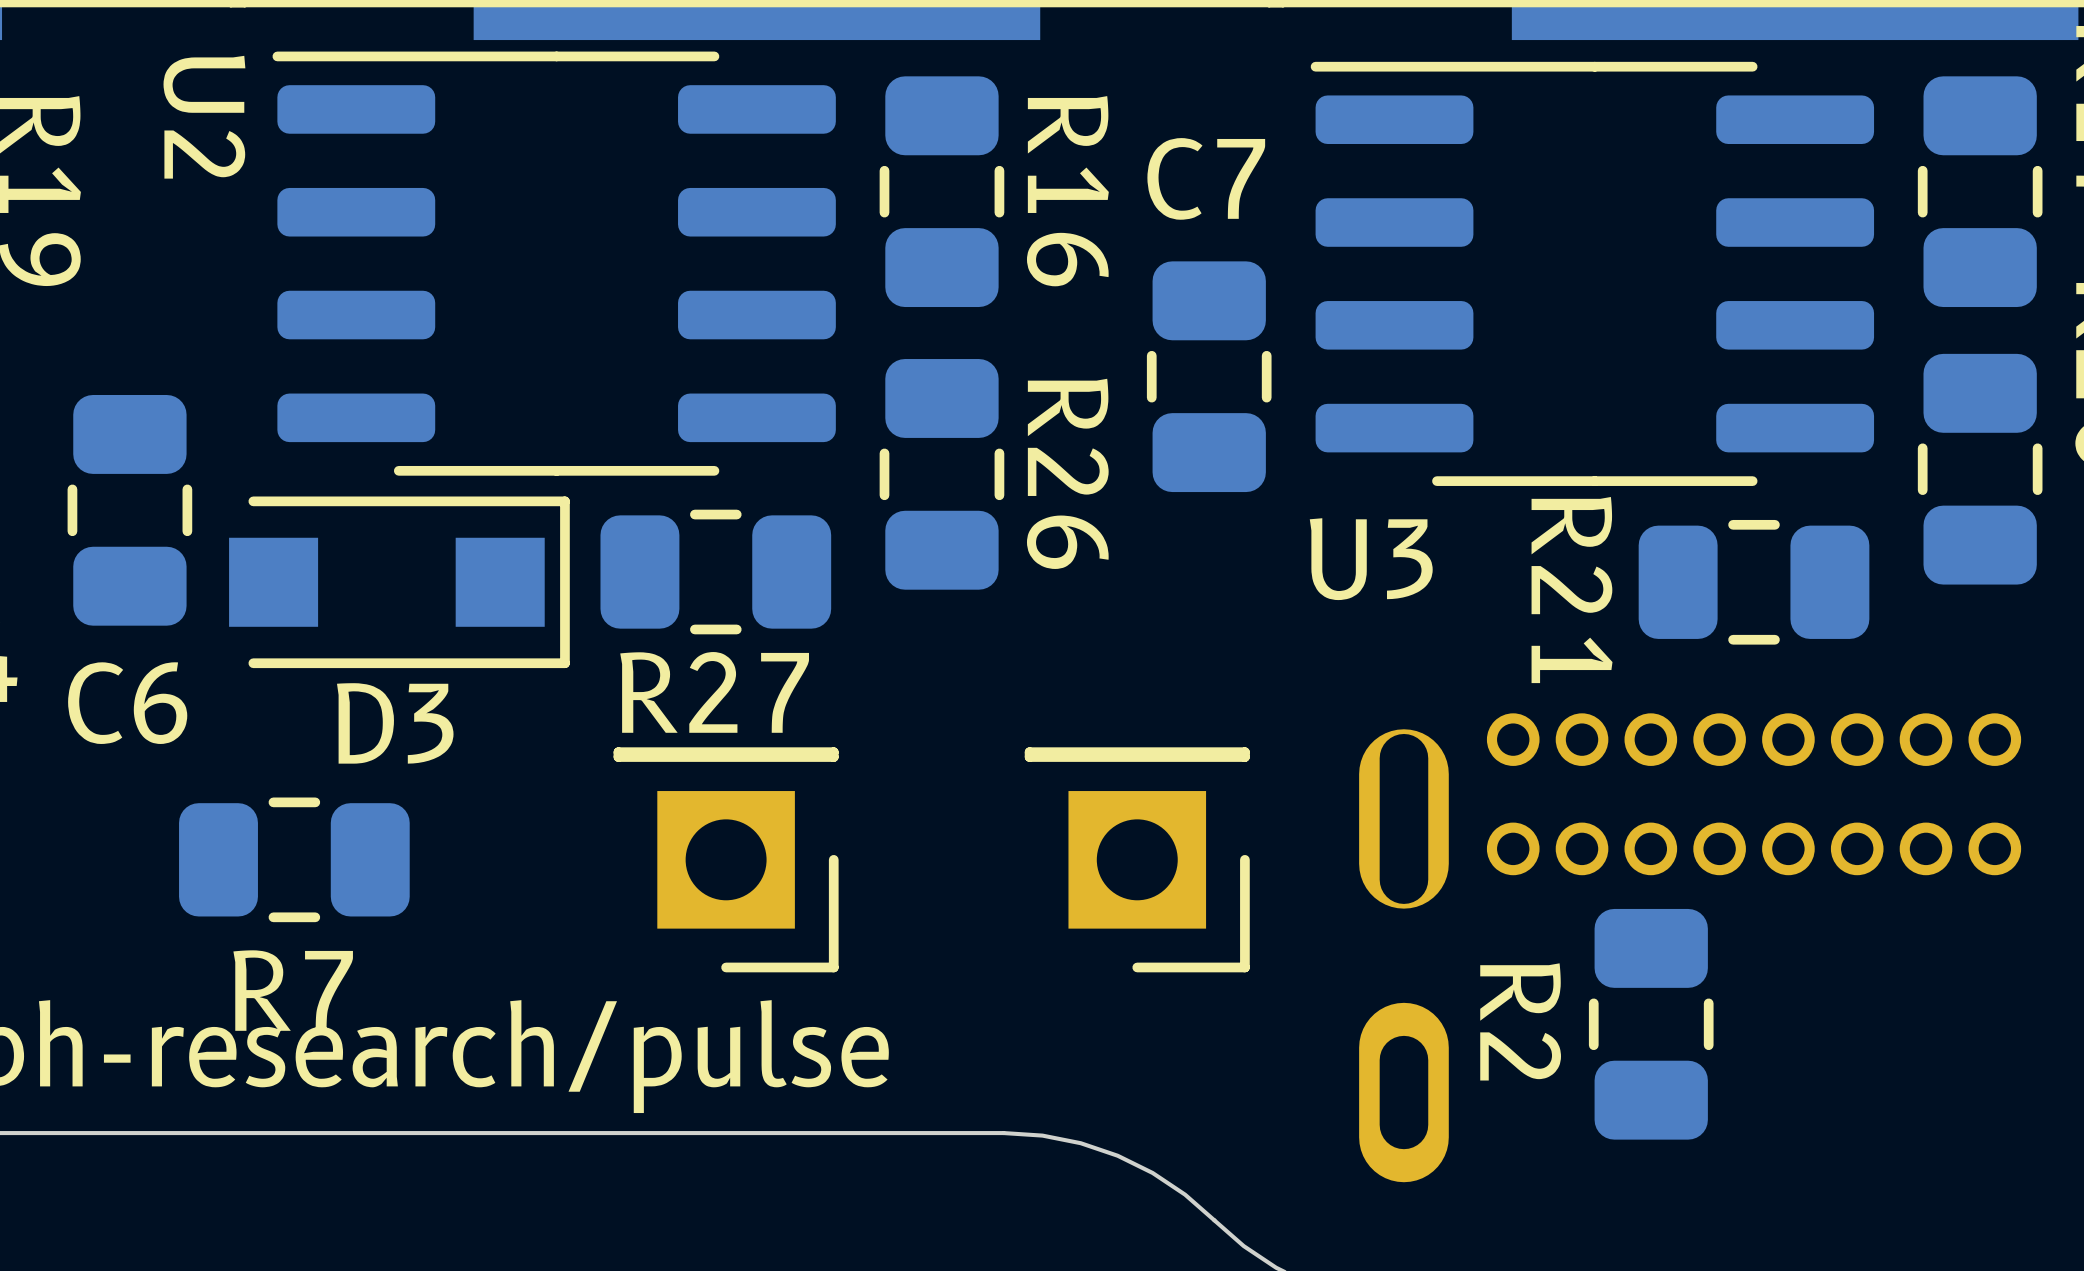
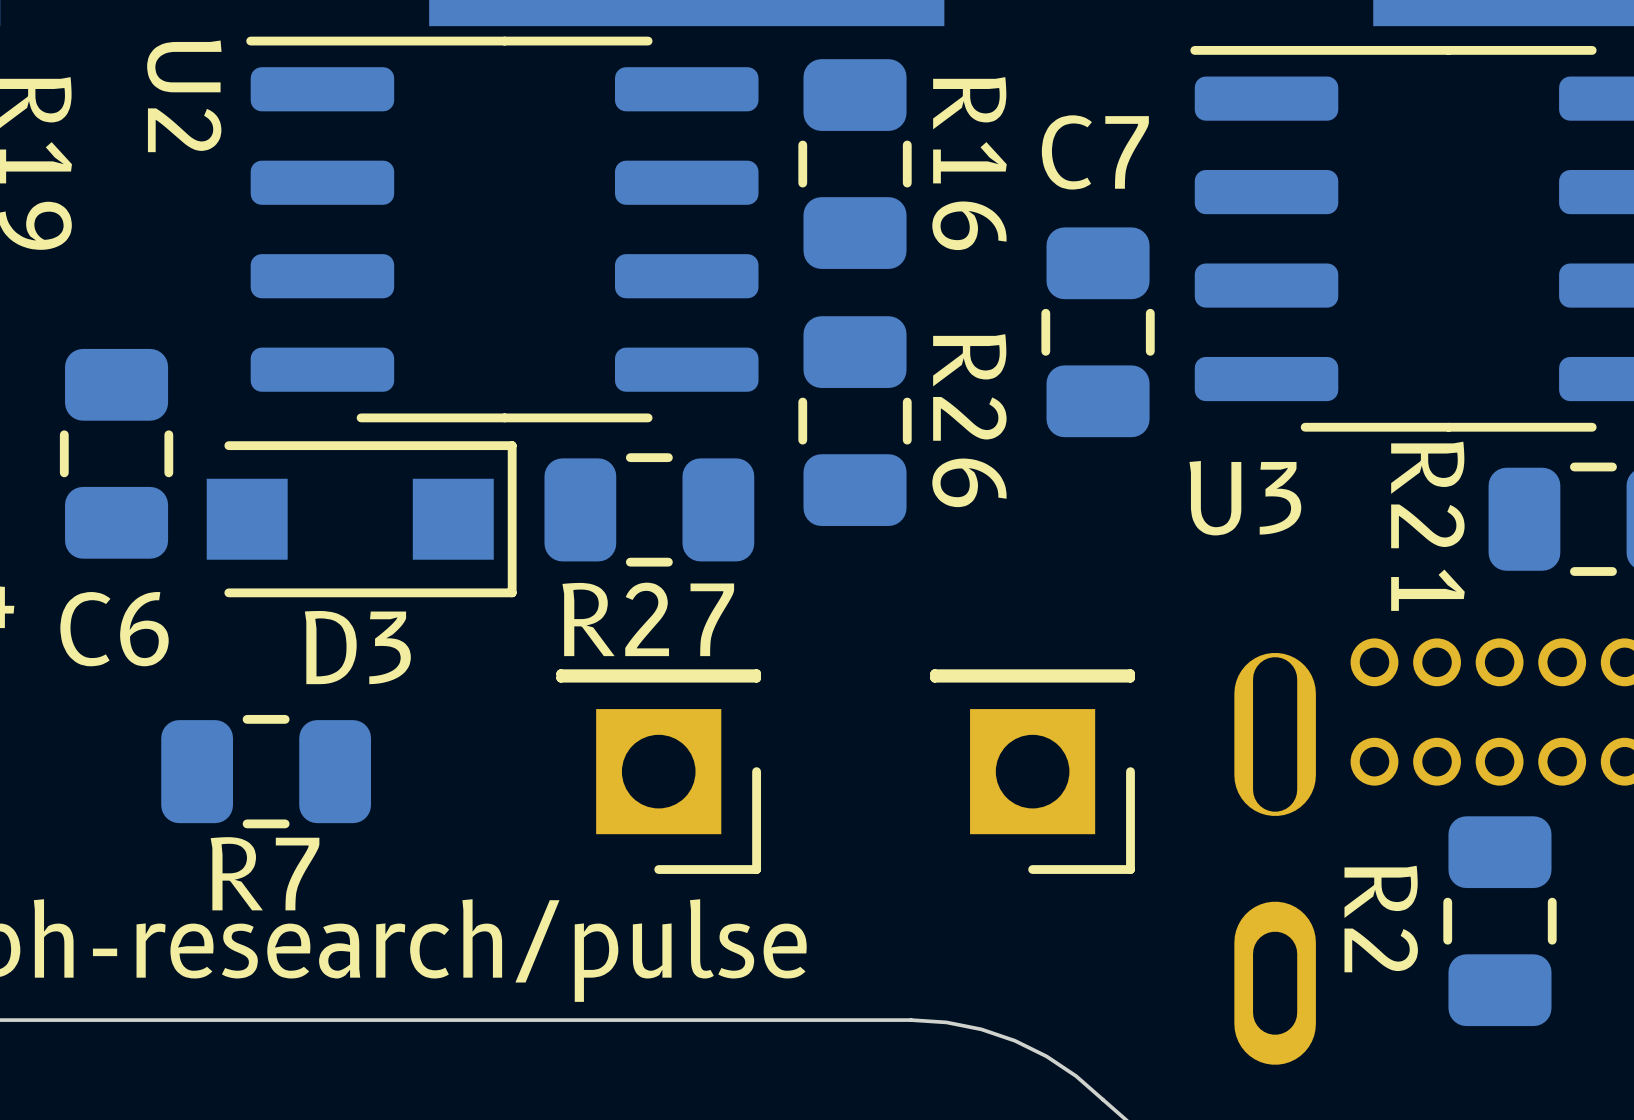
R7 name position: R7 (293, 990) -> R7 (265, 873)

